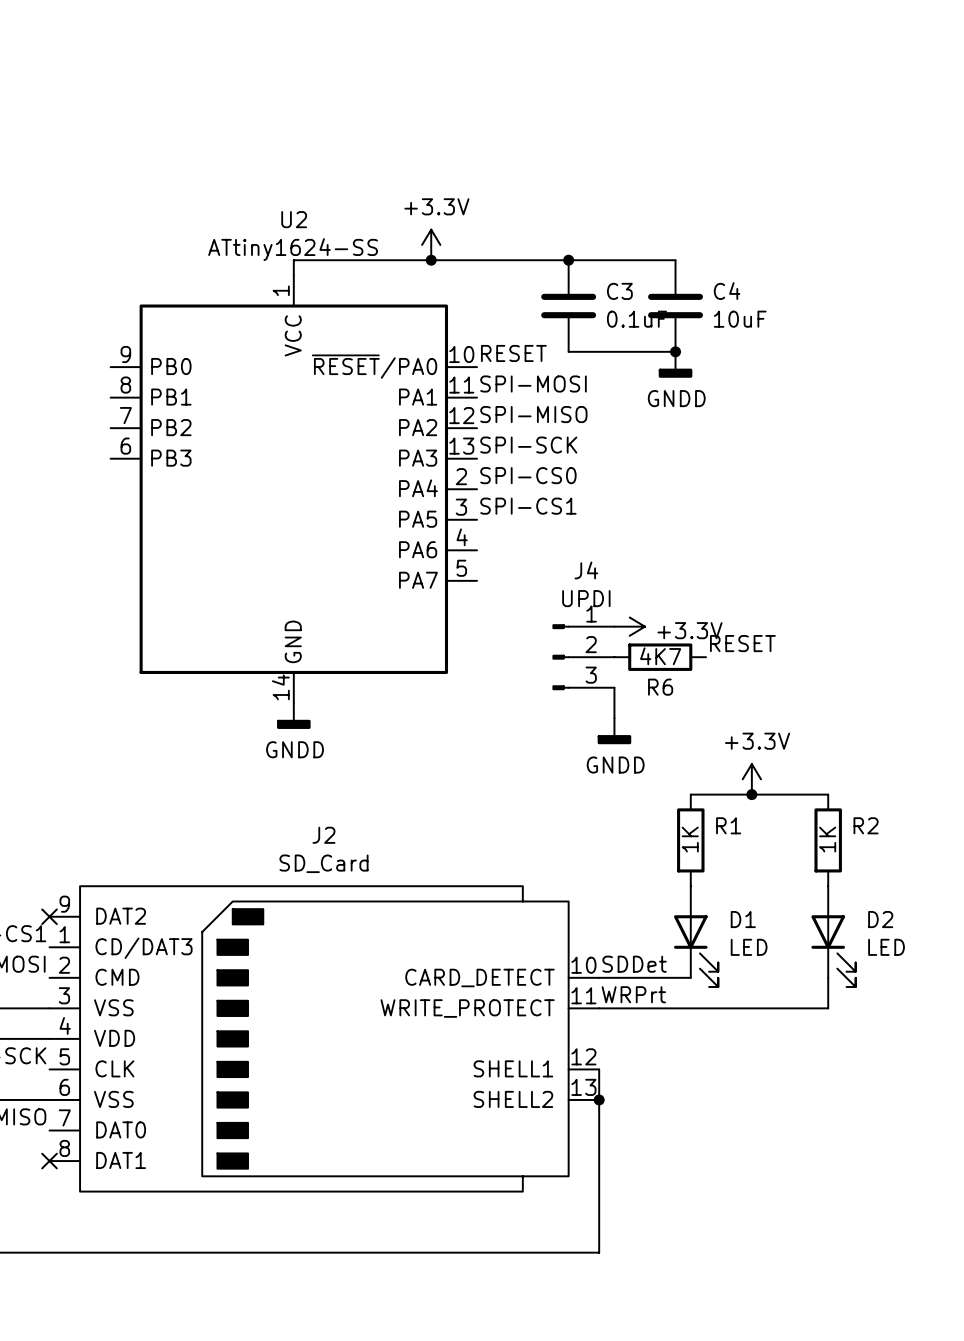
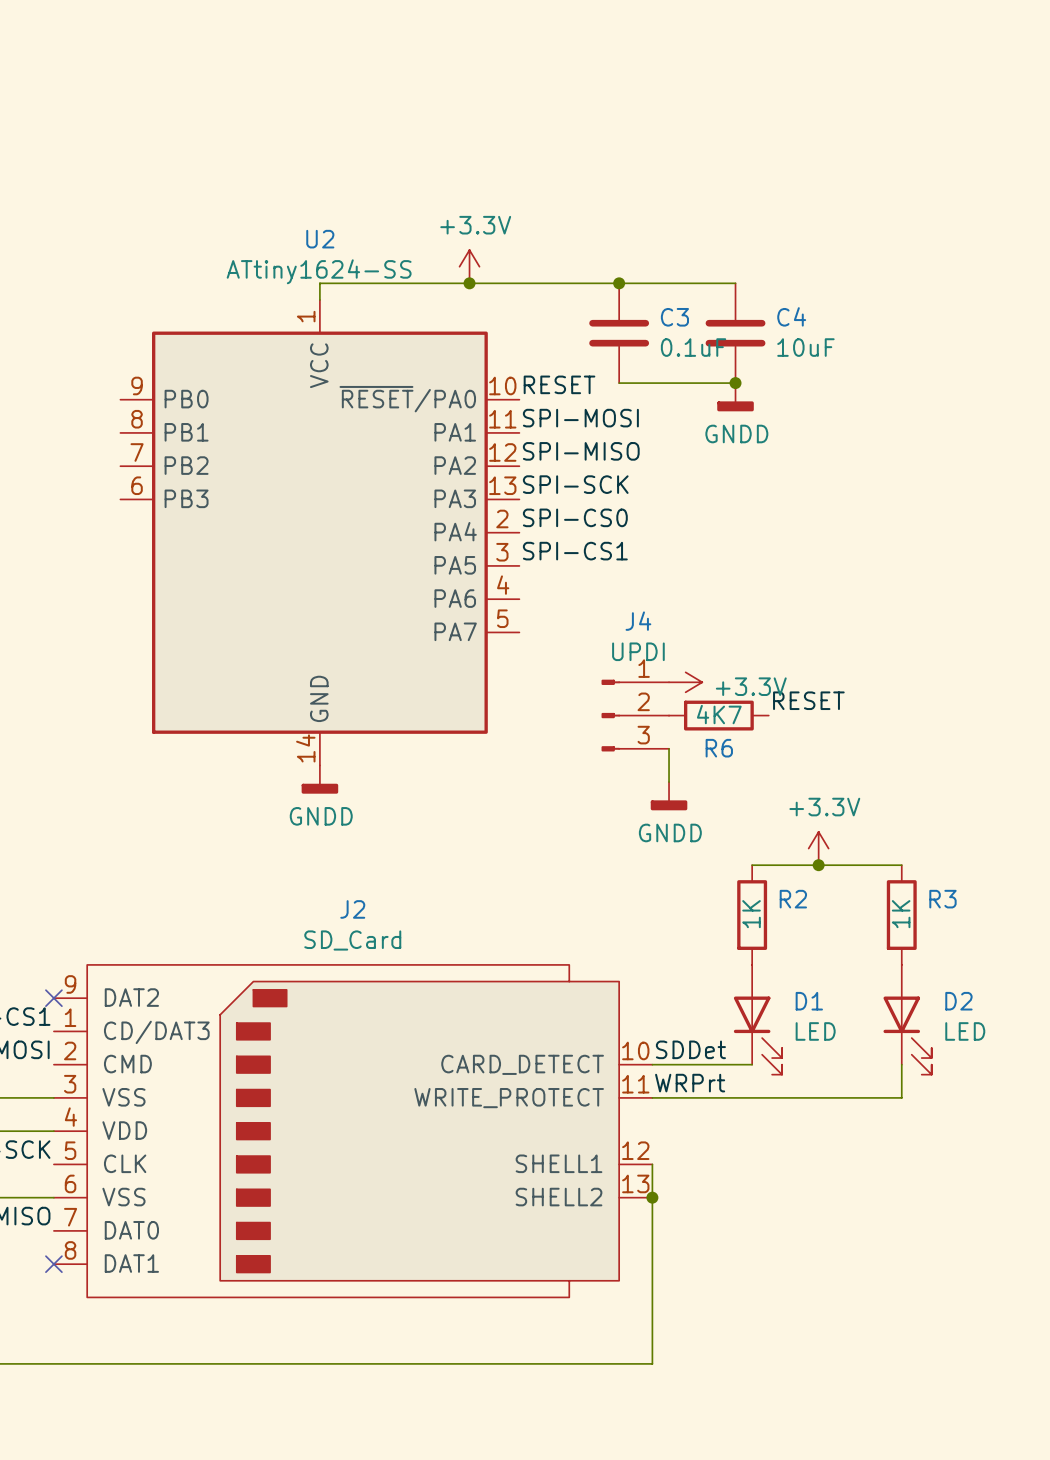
R1 name: R1 (728, 825) -> R2 (793, 899)
R2 name: R2 (866, 825) -> R3 (942, 899)

